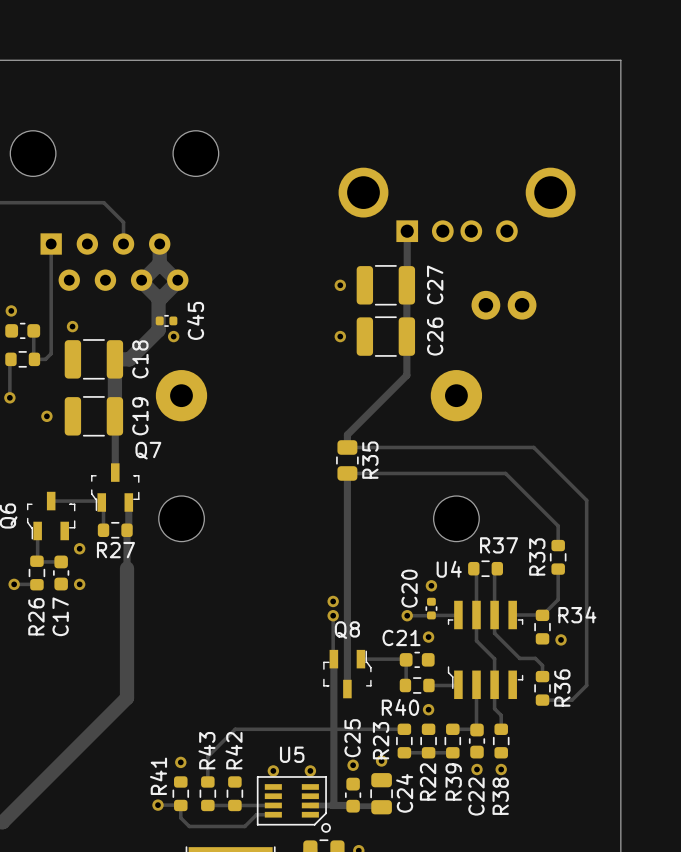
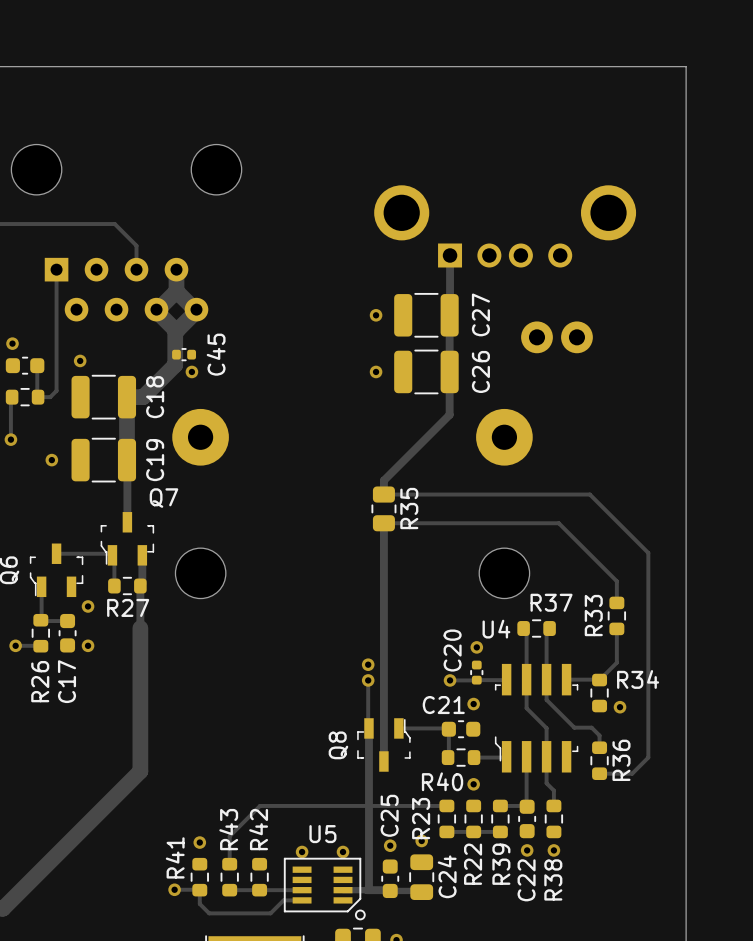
Q8 name rotation: 0° (347, 630) -> 90° counterclockwise (338, 745)
Q8 name position: Q8 (347, 630) -> Q8 (338, 745)

